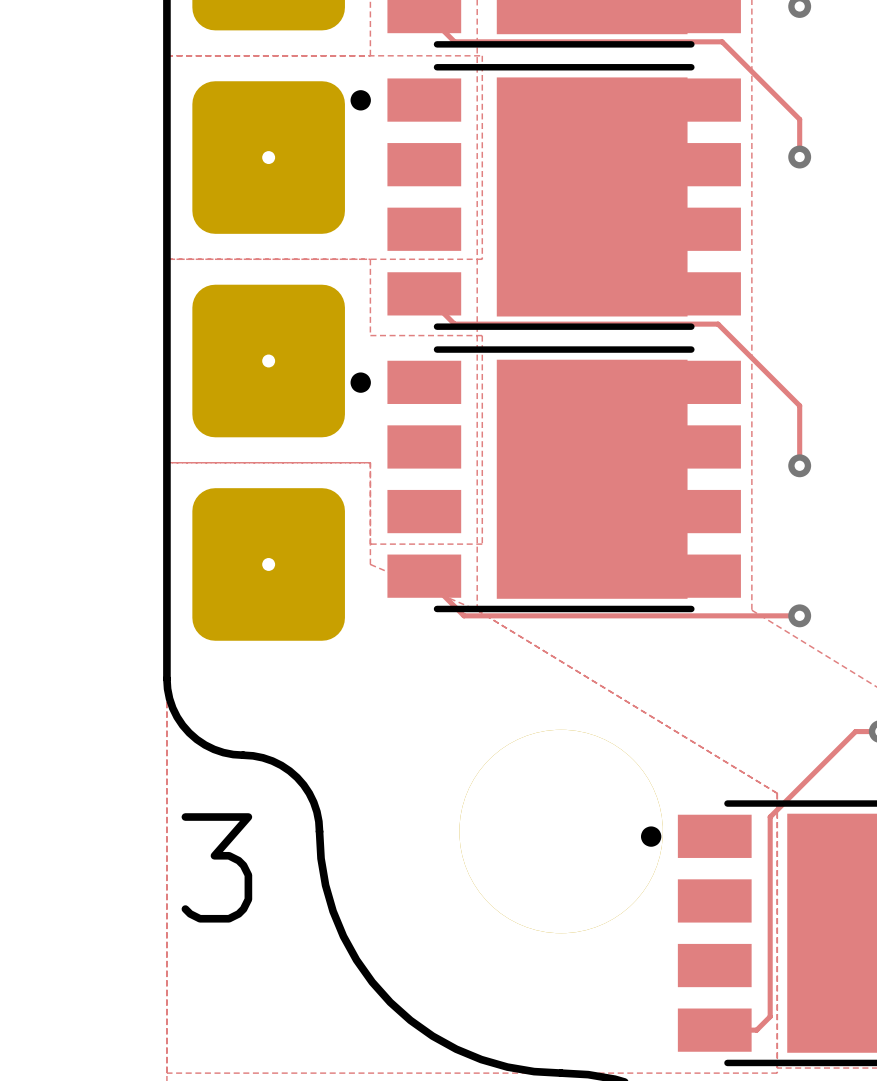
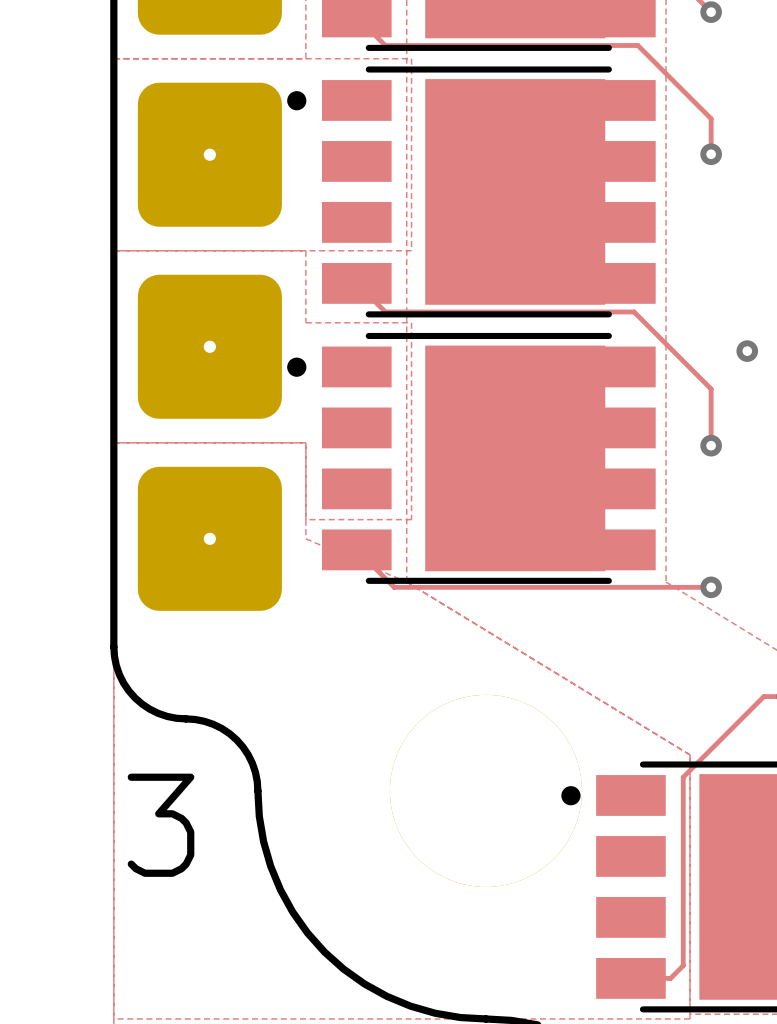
via: none -> (747, 351)

